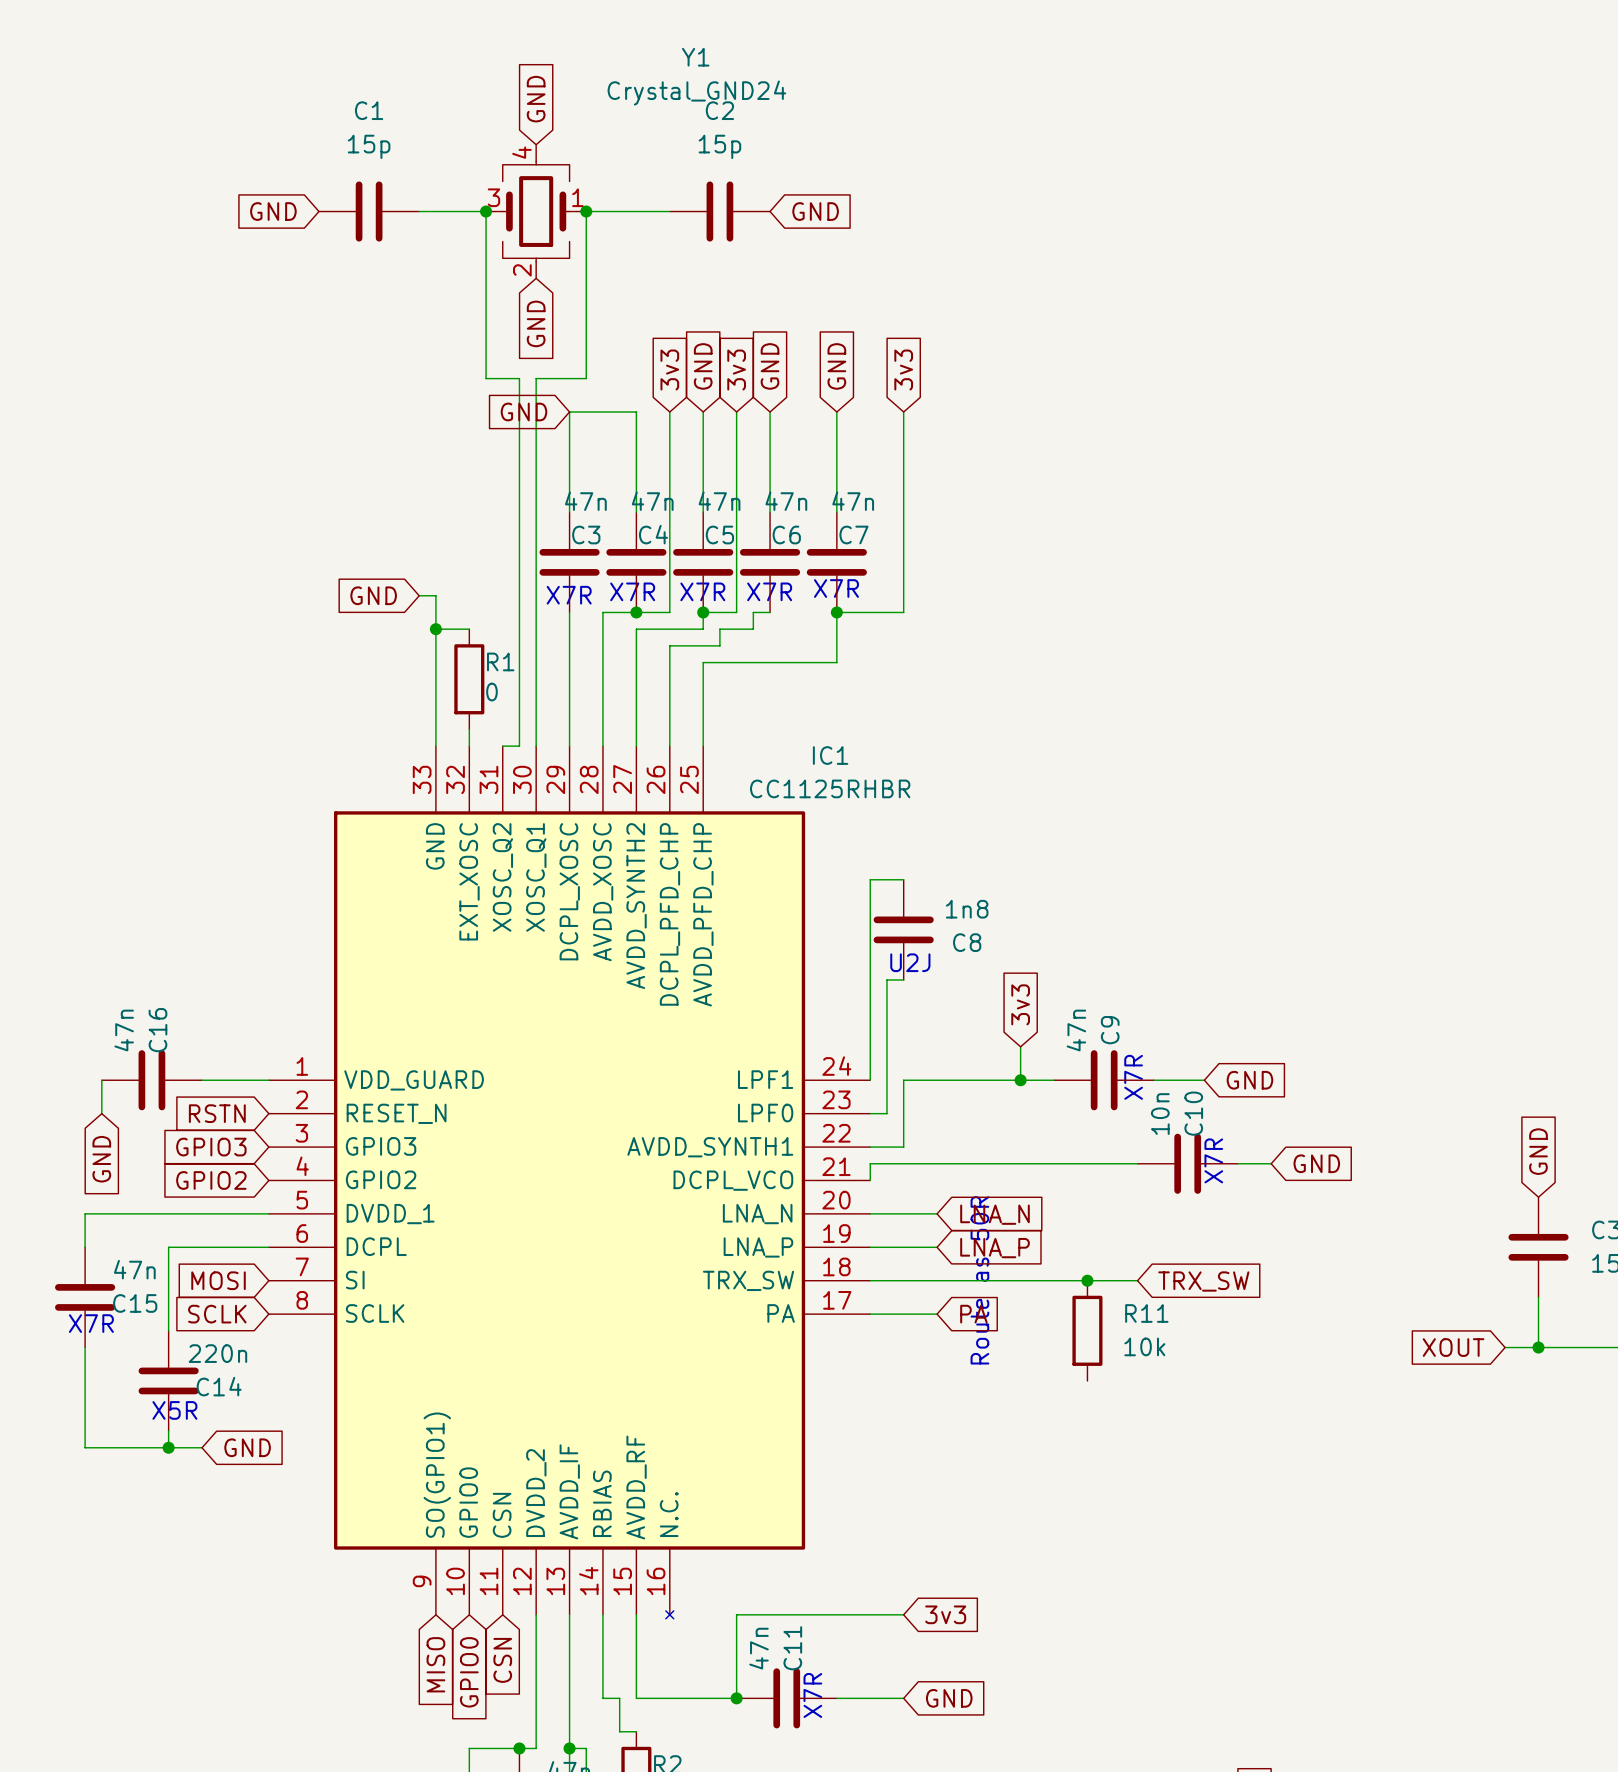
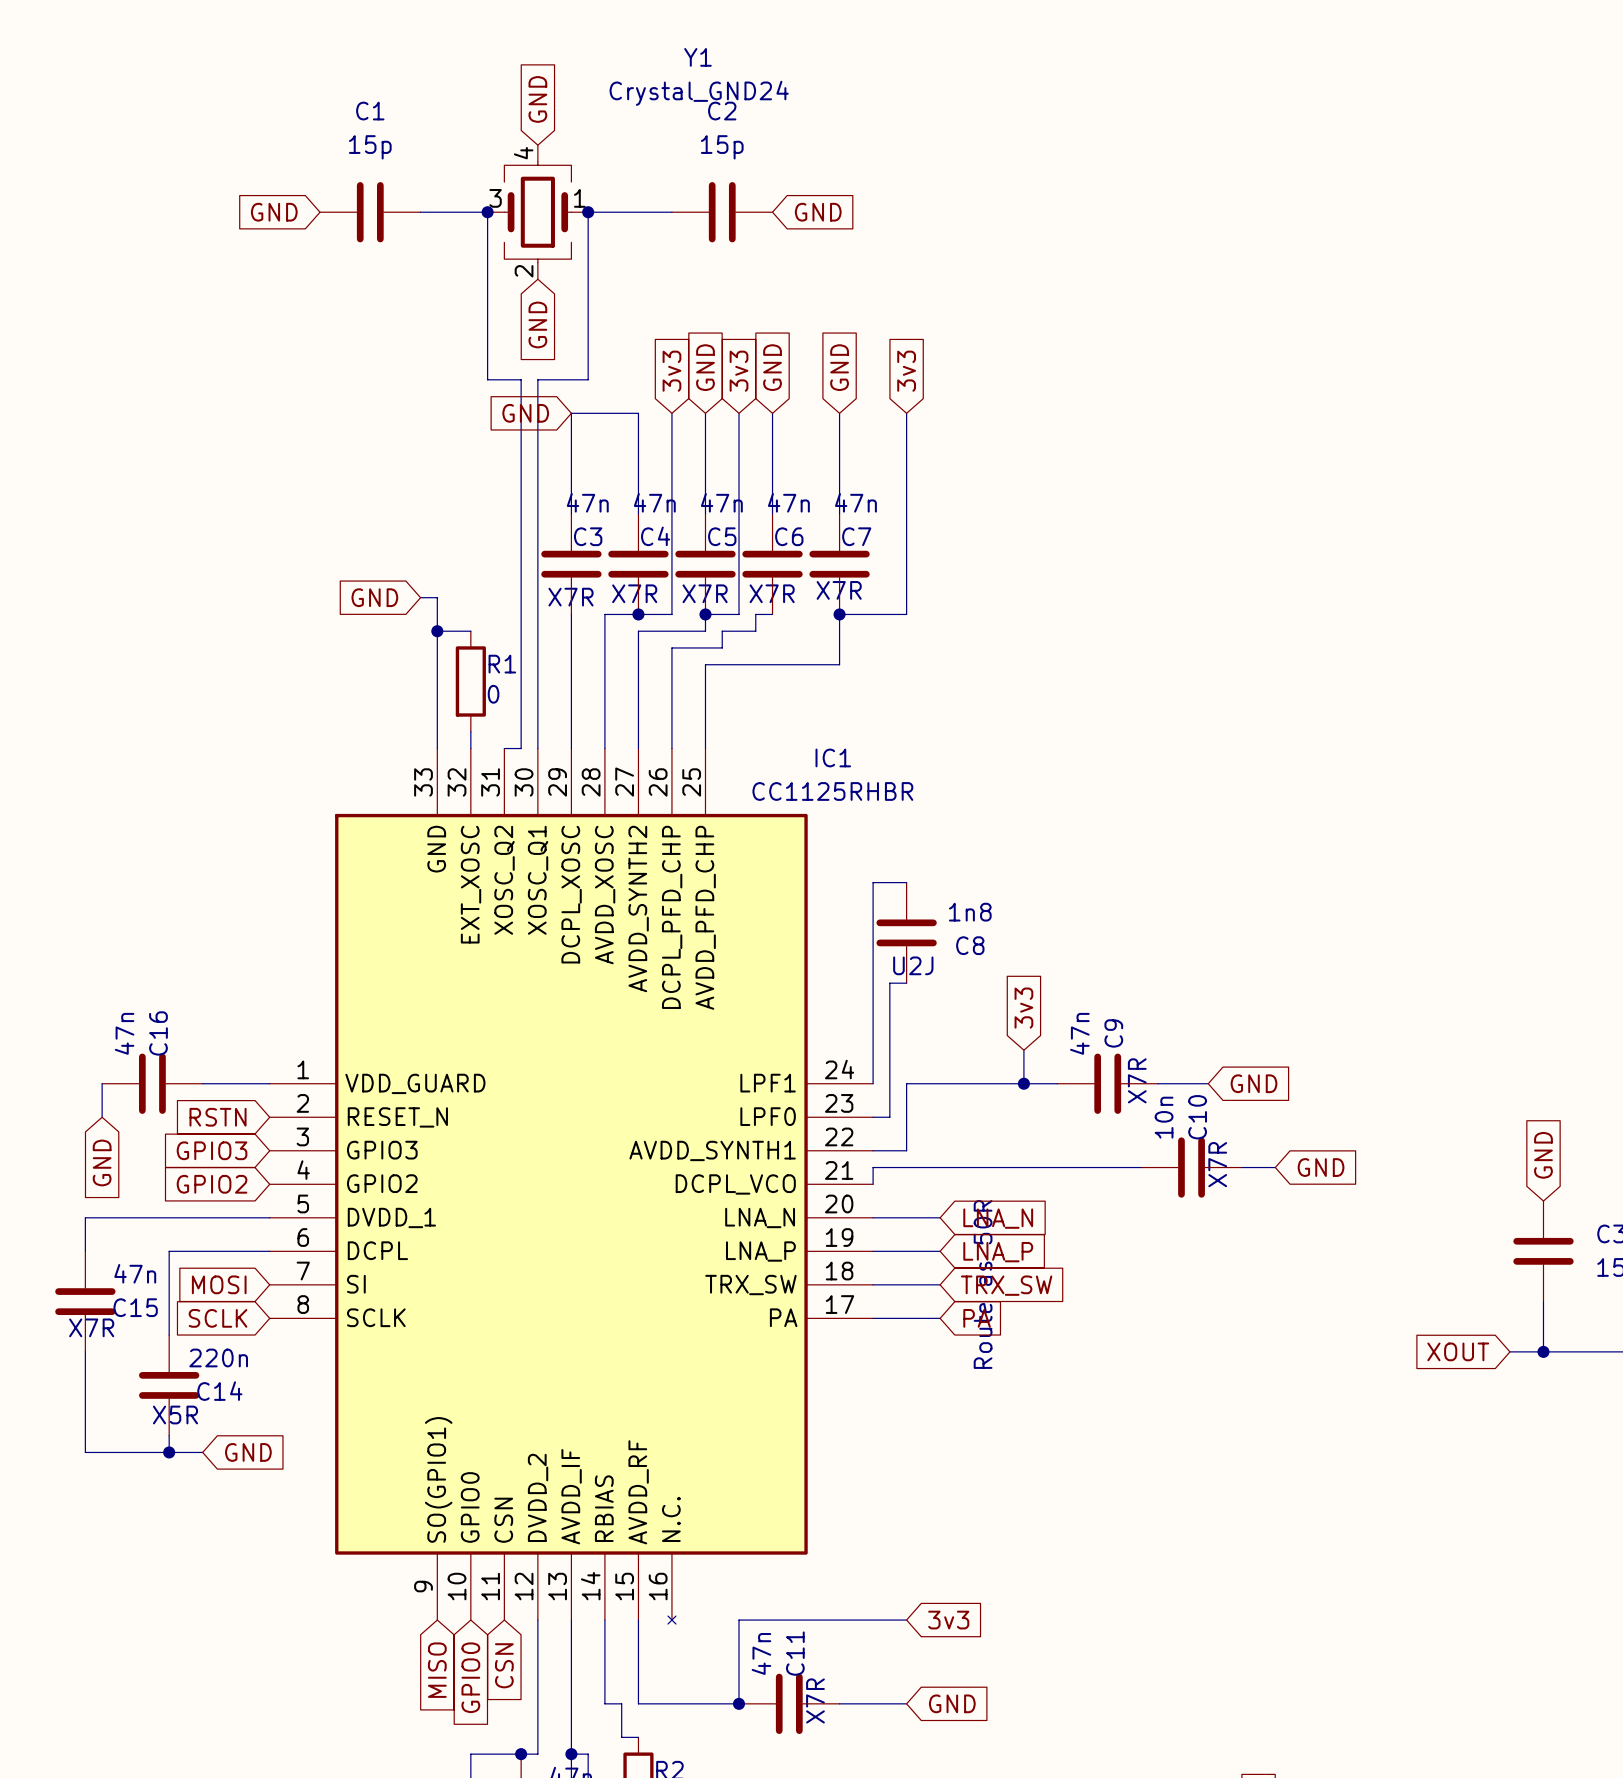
wire: (937, 1280) (1137, 1280) -> none
junction: (1087, 1280) -> none
global label position: TRX_SW (1203, 1281) -> TRX_SW (1006, 1285)
R11: 10k (1087, 1330) -> none

